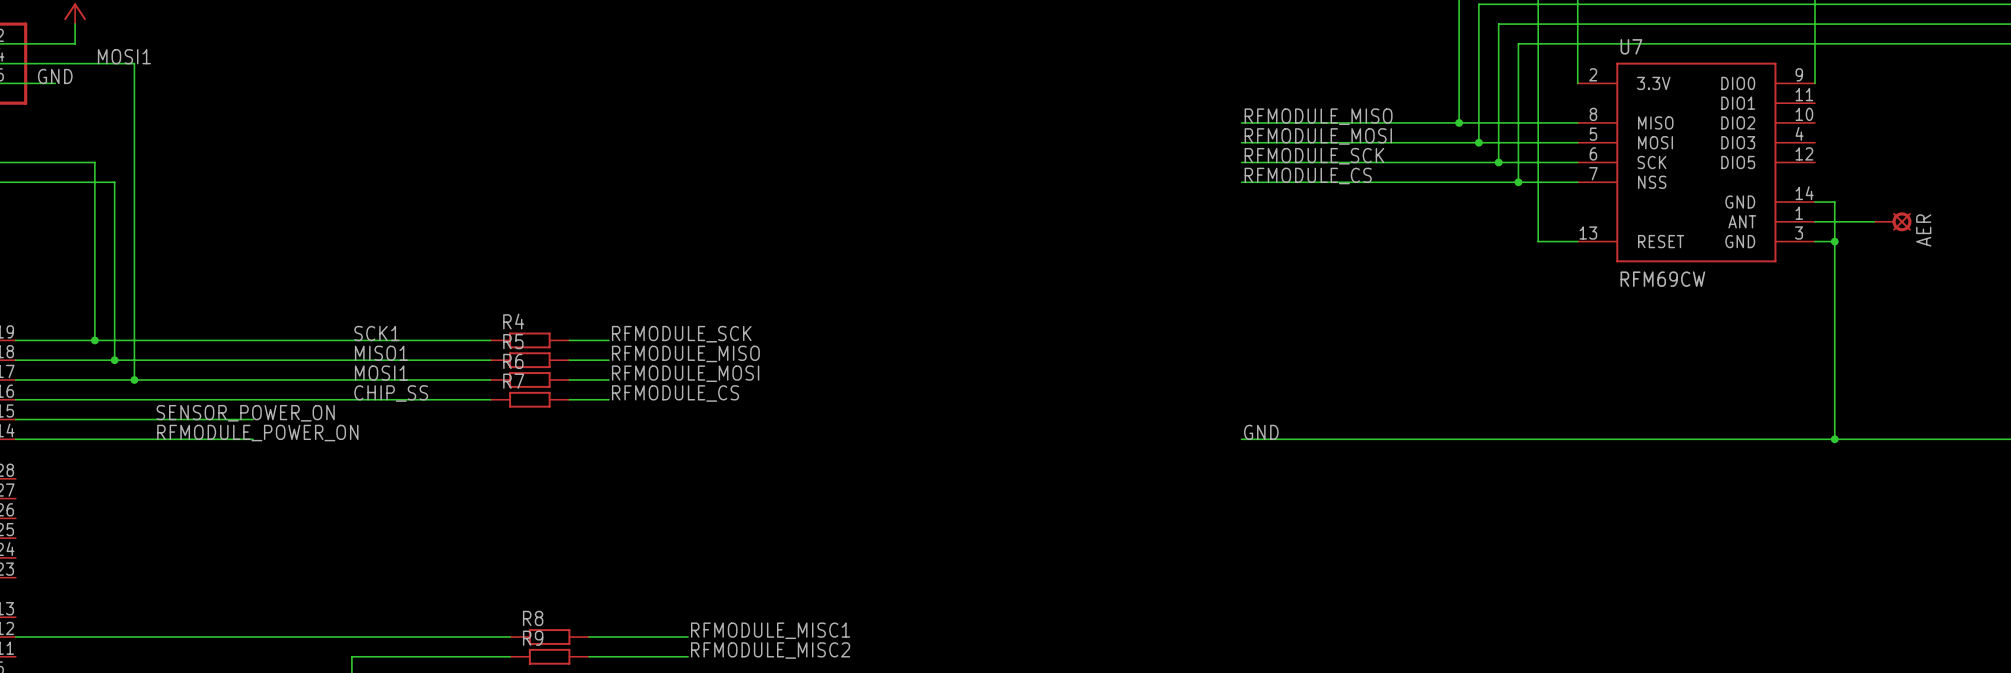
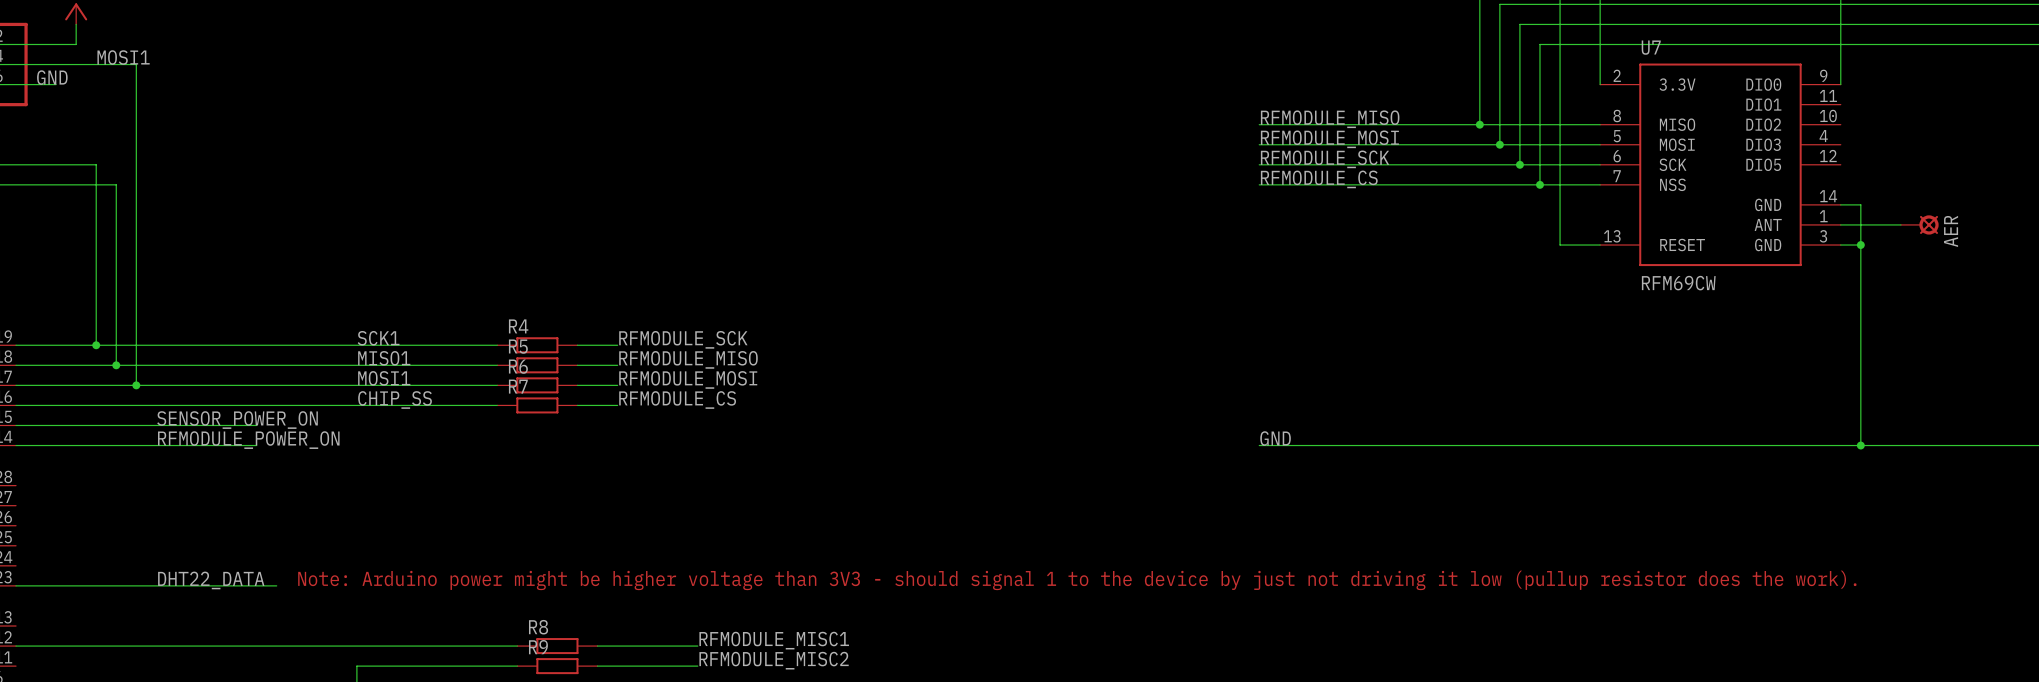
label: none -> DHT22_DATA (211, 580)
text: none -> Note: Arduino power might be higher voltage than 3V3 - should signal 1 to the device by just not driving it low (pullup resistor does the work). (1077, 580)
wire: none -> (16, 585) (276, 585)

